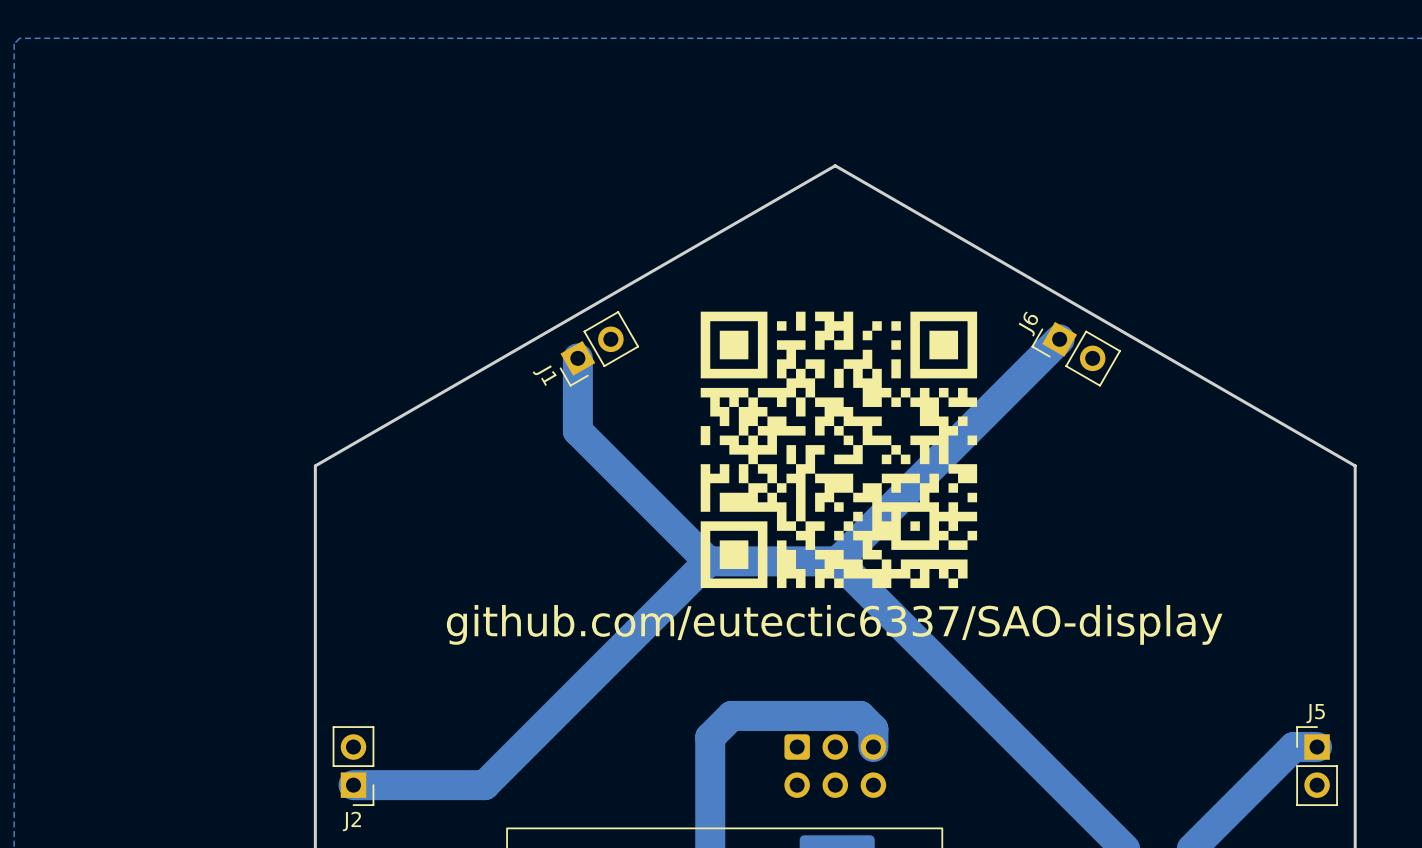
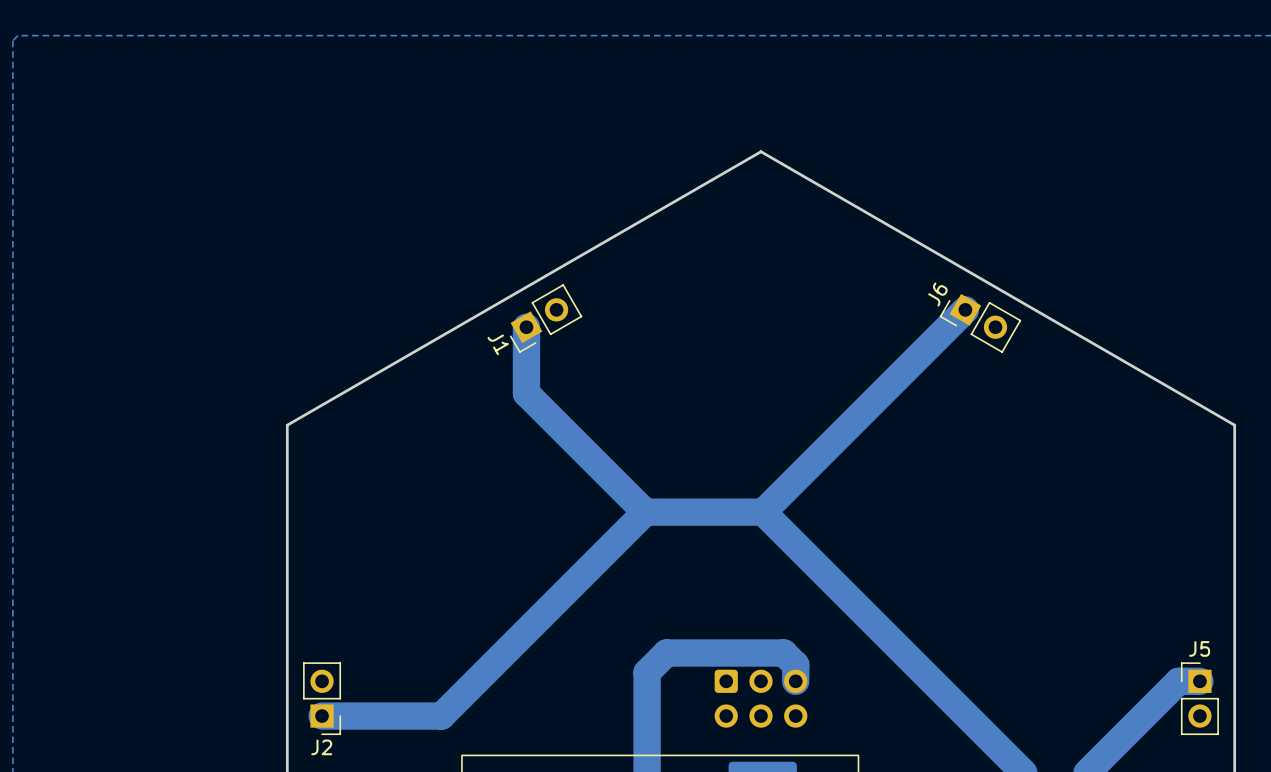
drawing: [700, 311, 978, 589] -> none
text: github.com/eutectic6337/SAO-display (834, 624) -> none

